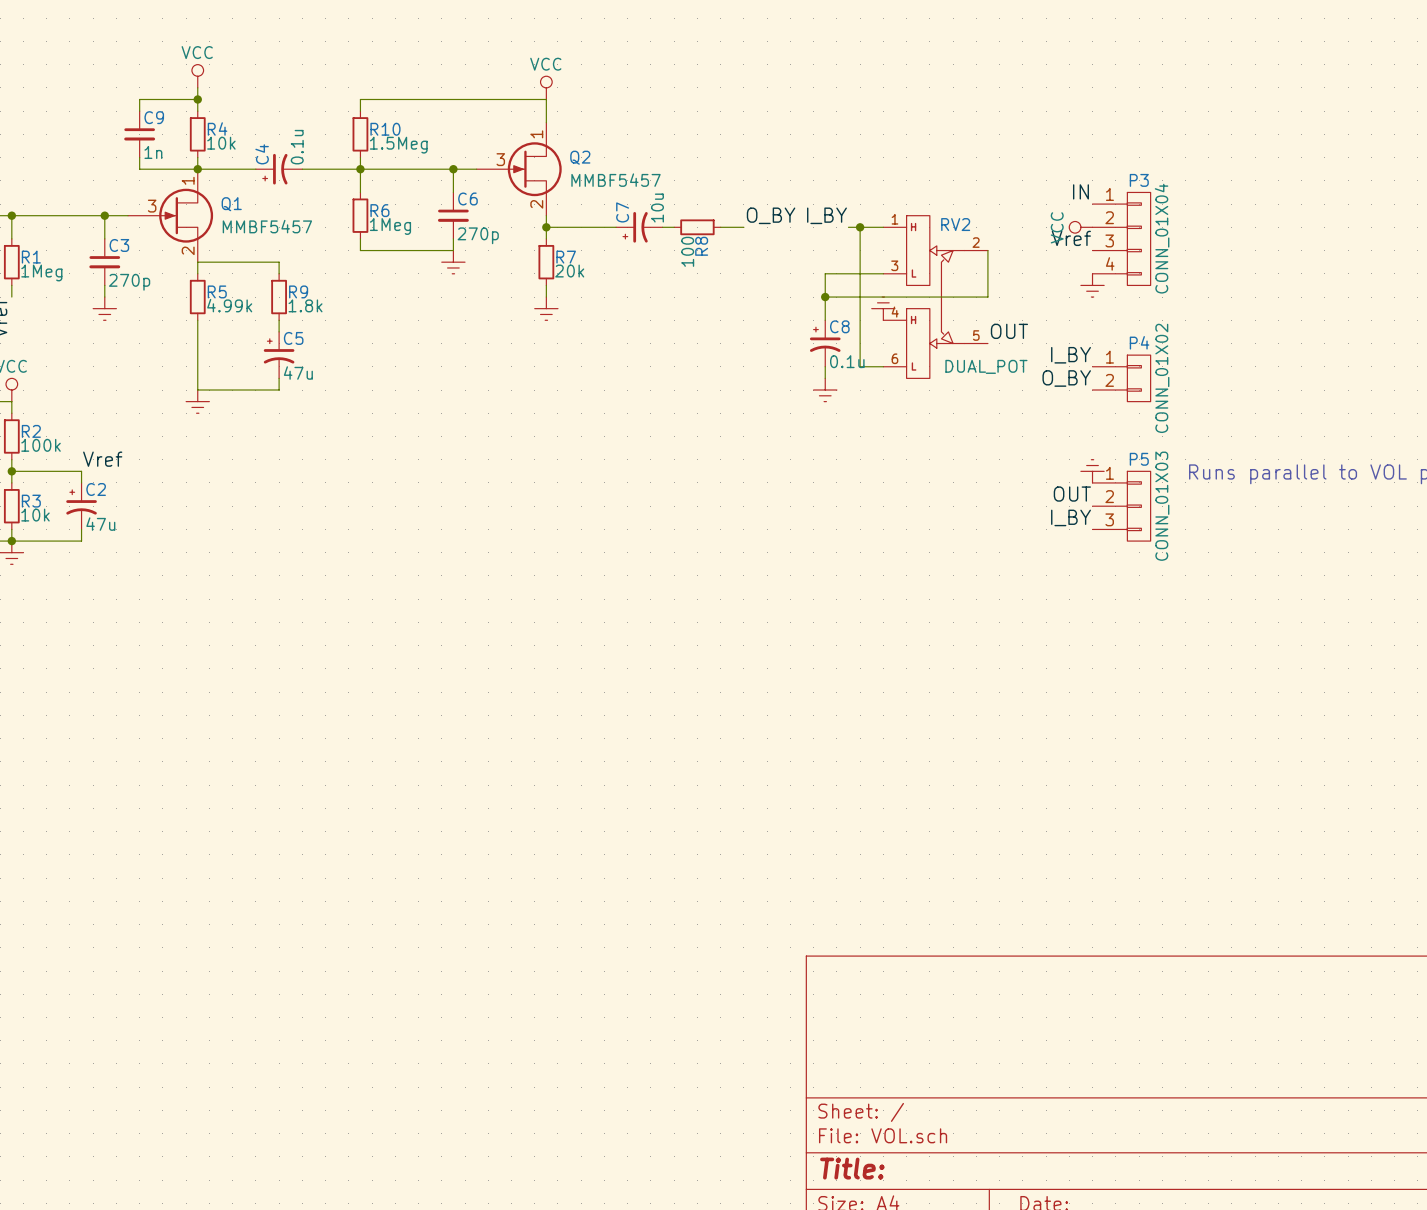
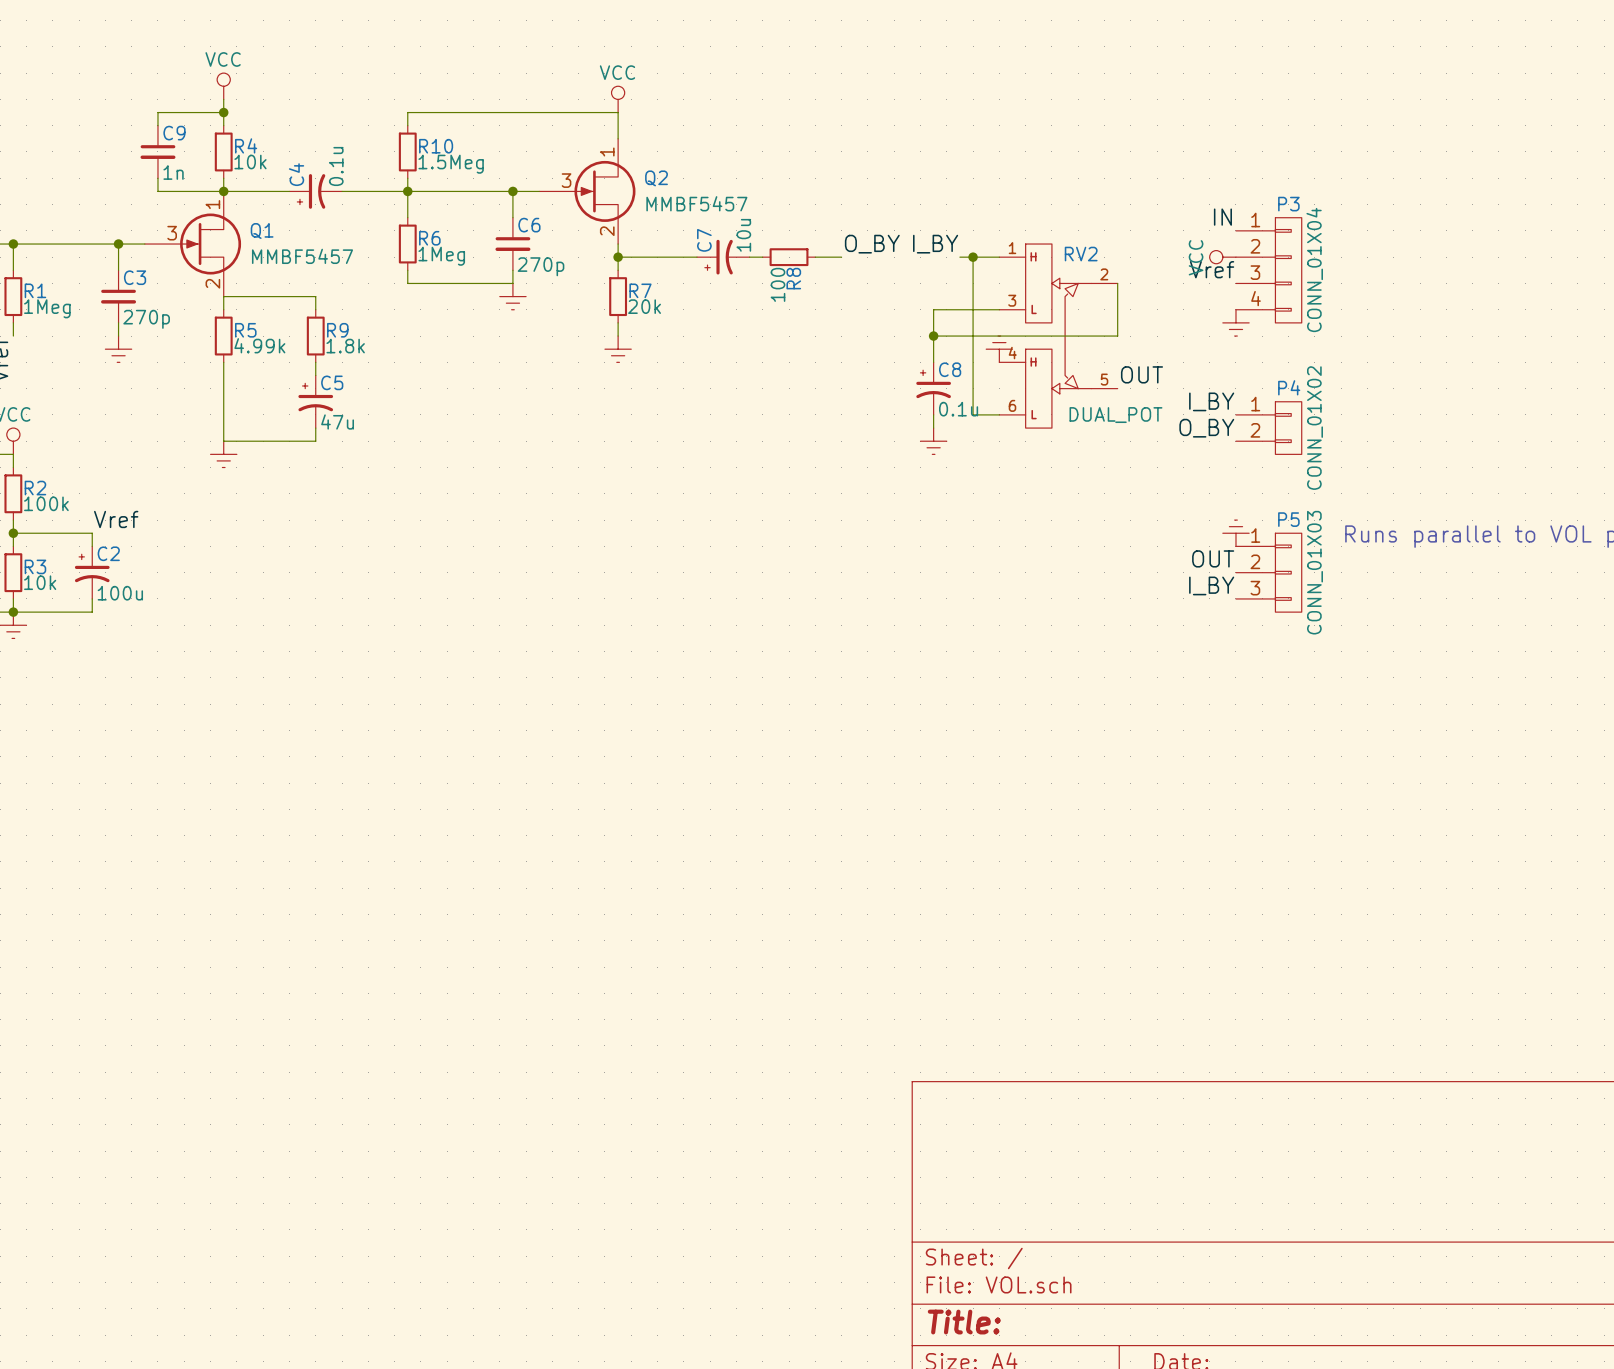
C2 value: 47u (100, 524) -> 100u (120, 593)

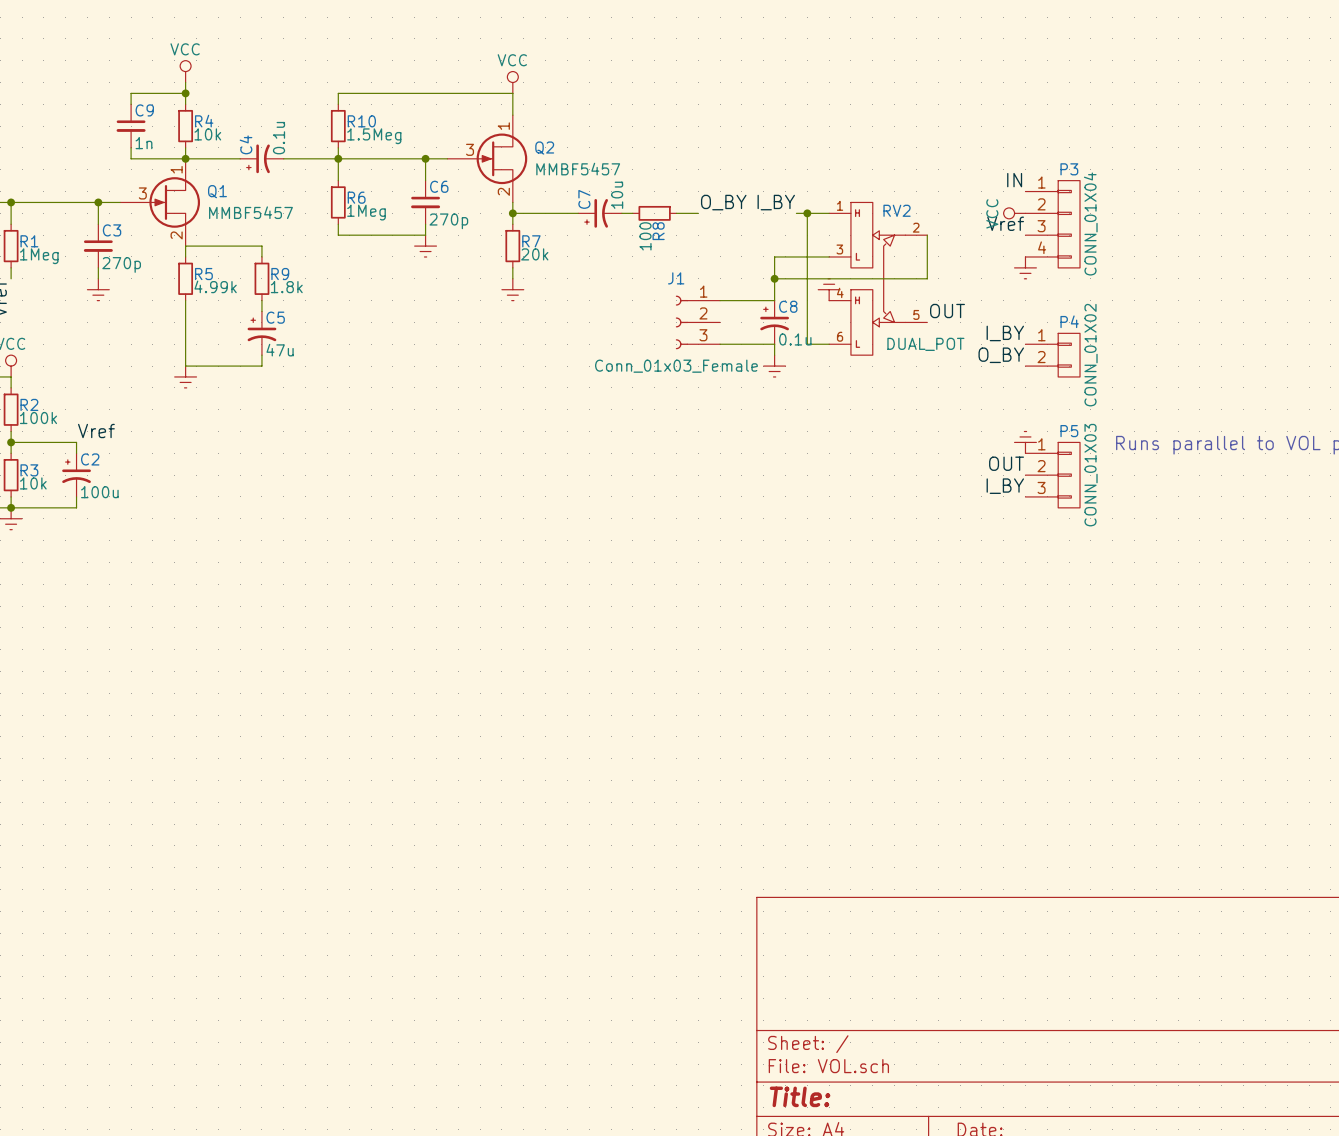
wire: none -> (720, 300) (774, 300)
J1: none -> Conn_01x03_Female (697, 322)
wire: none -> (720, 344) (774, 344)

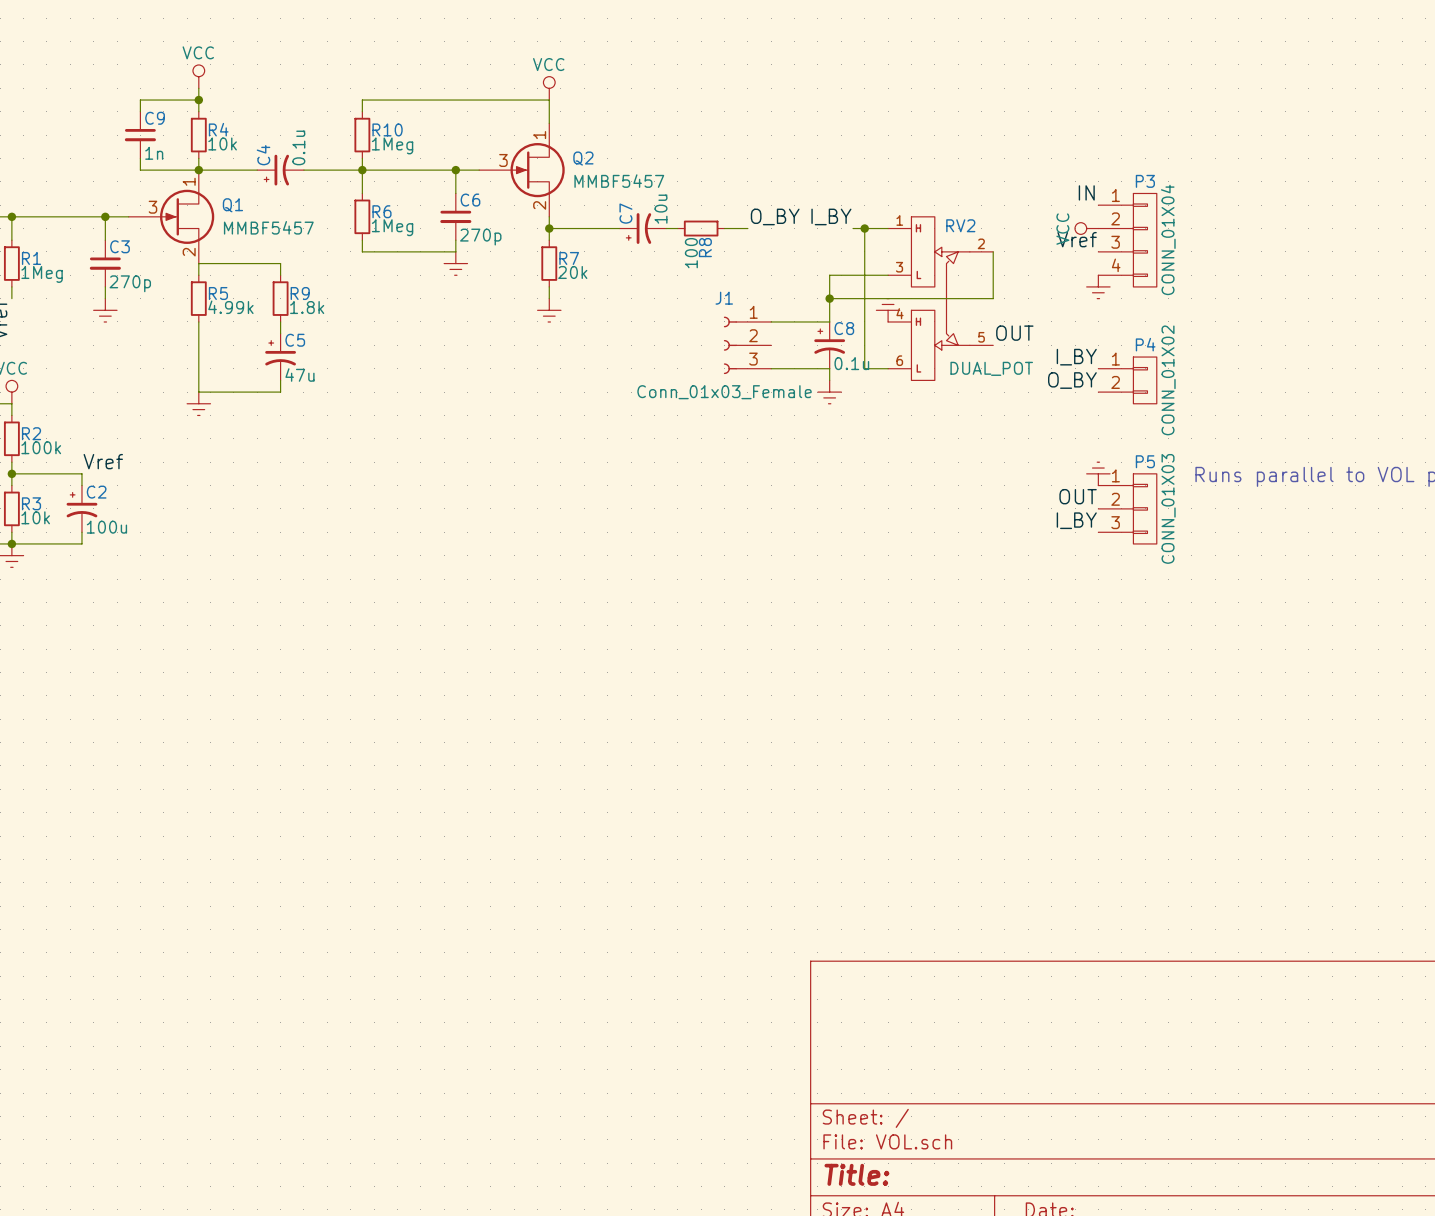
R10 value: 1.5Meg (374, 136) -> 1Meg (392, 145)

